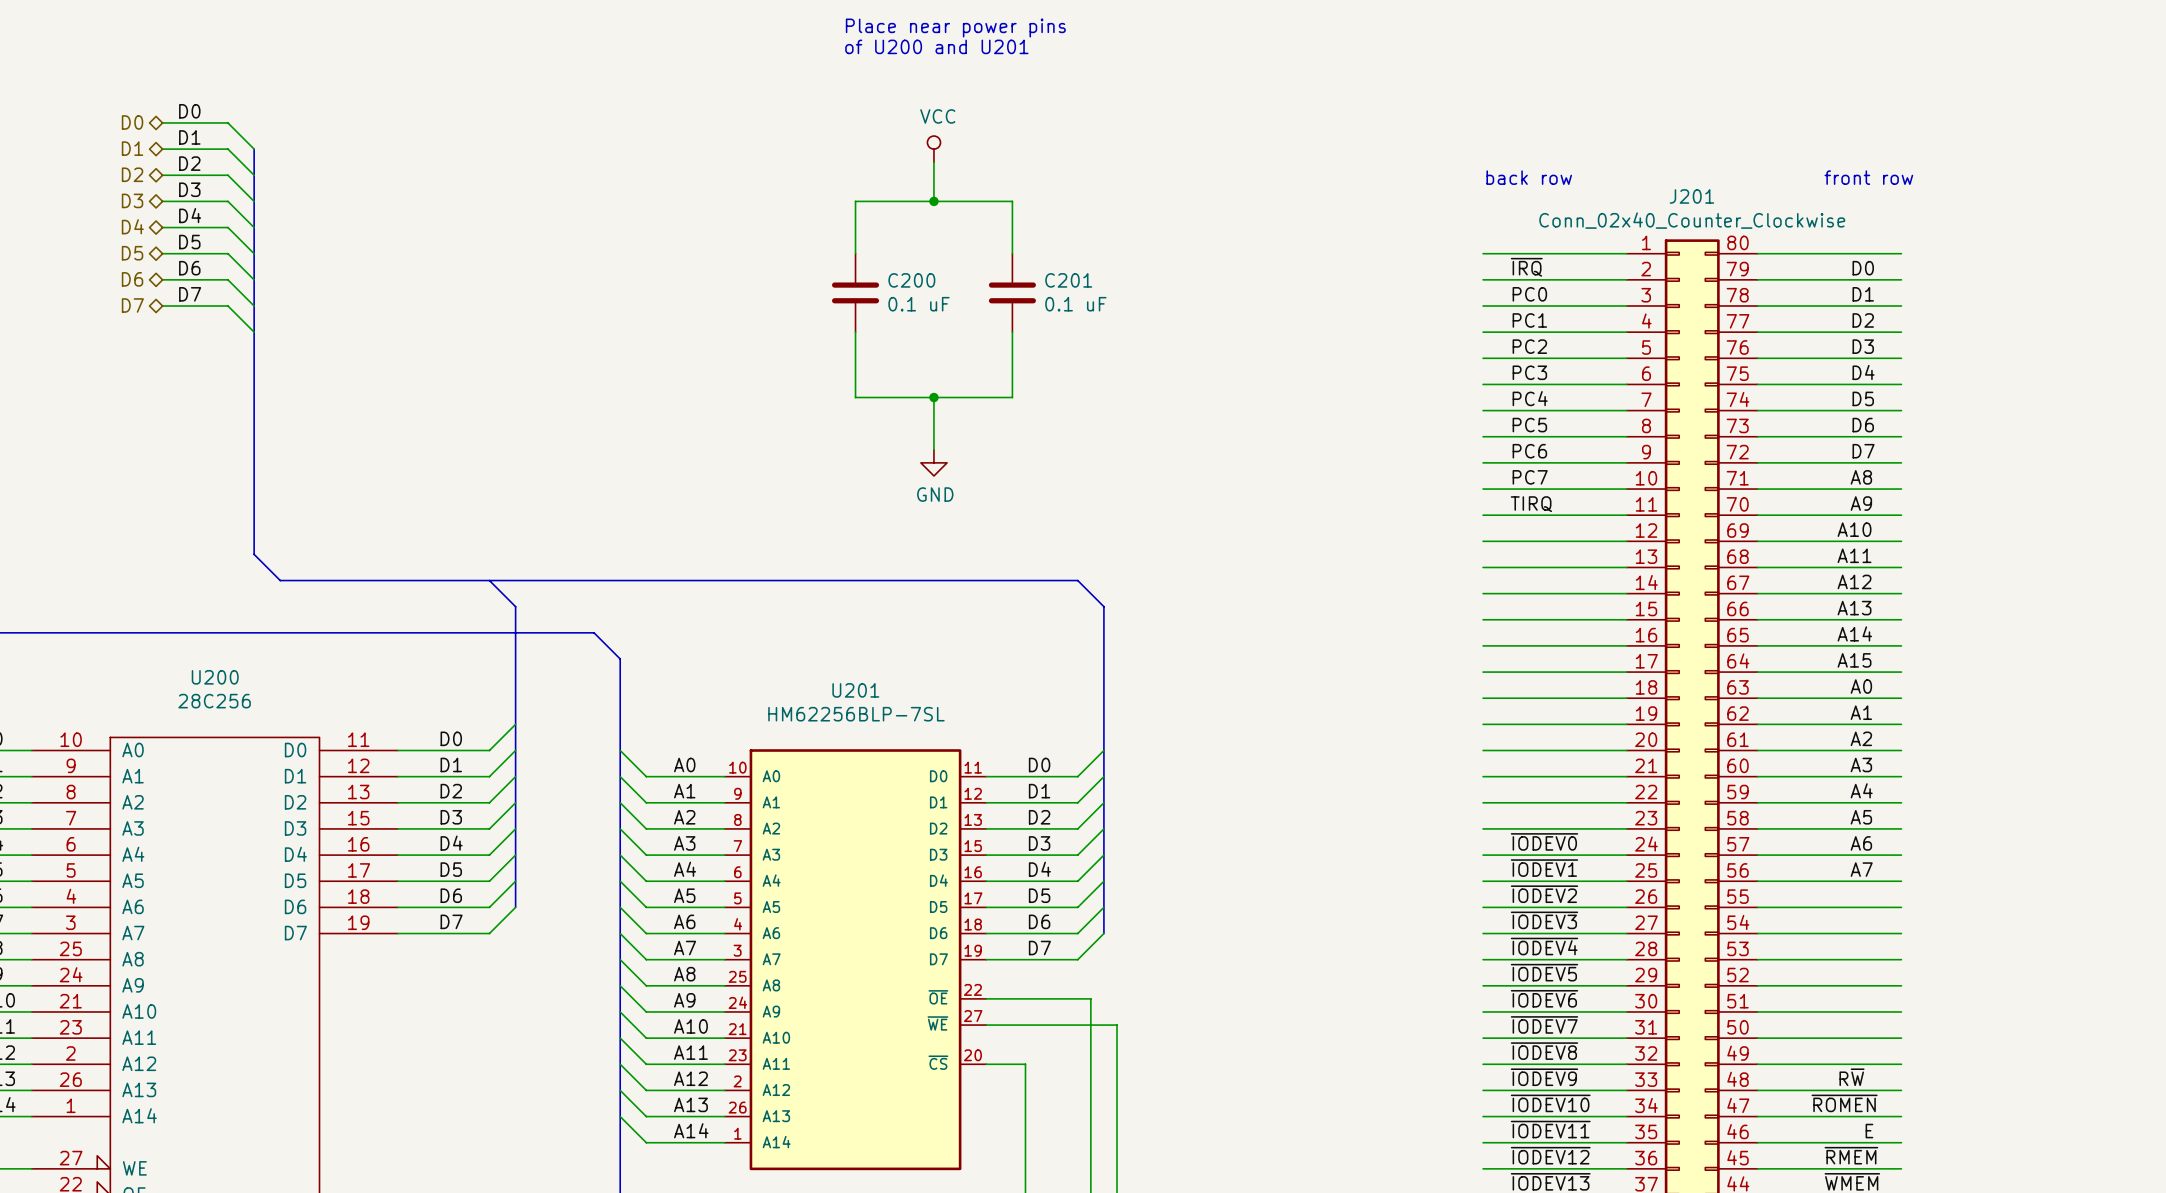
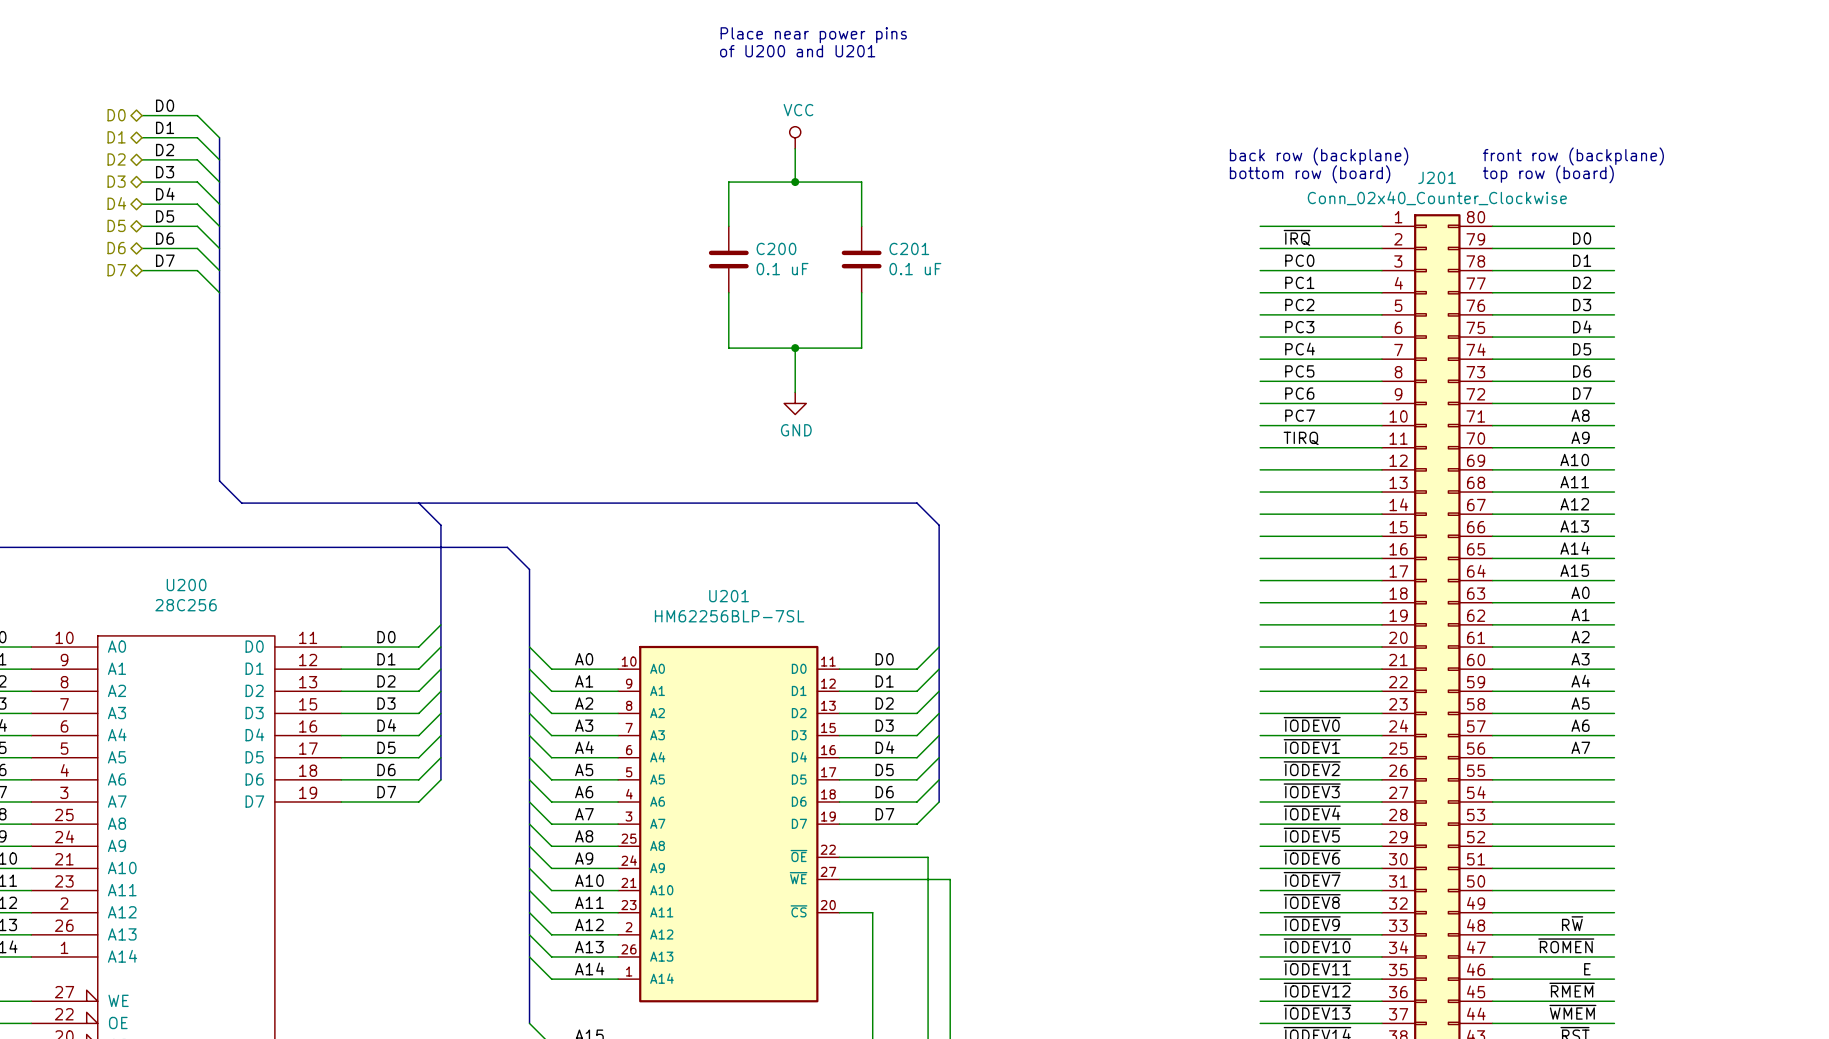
text: none -> back row (backplane) (1319, 156)
text: none -> front row (backplane) (1573, 156)
text: back row (1529, 177) -> none
text: front row (1868, 177) -> none
text: none -> bottom row (board) (1310, 174)
text: none -> top row (board) (1548, 174)

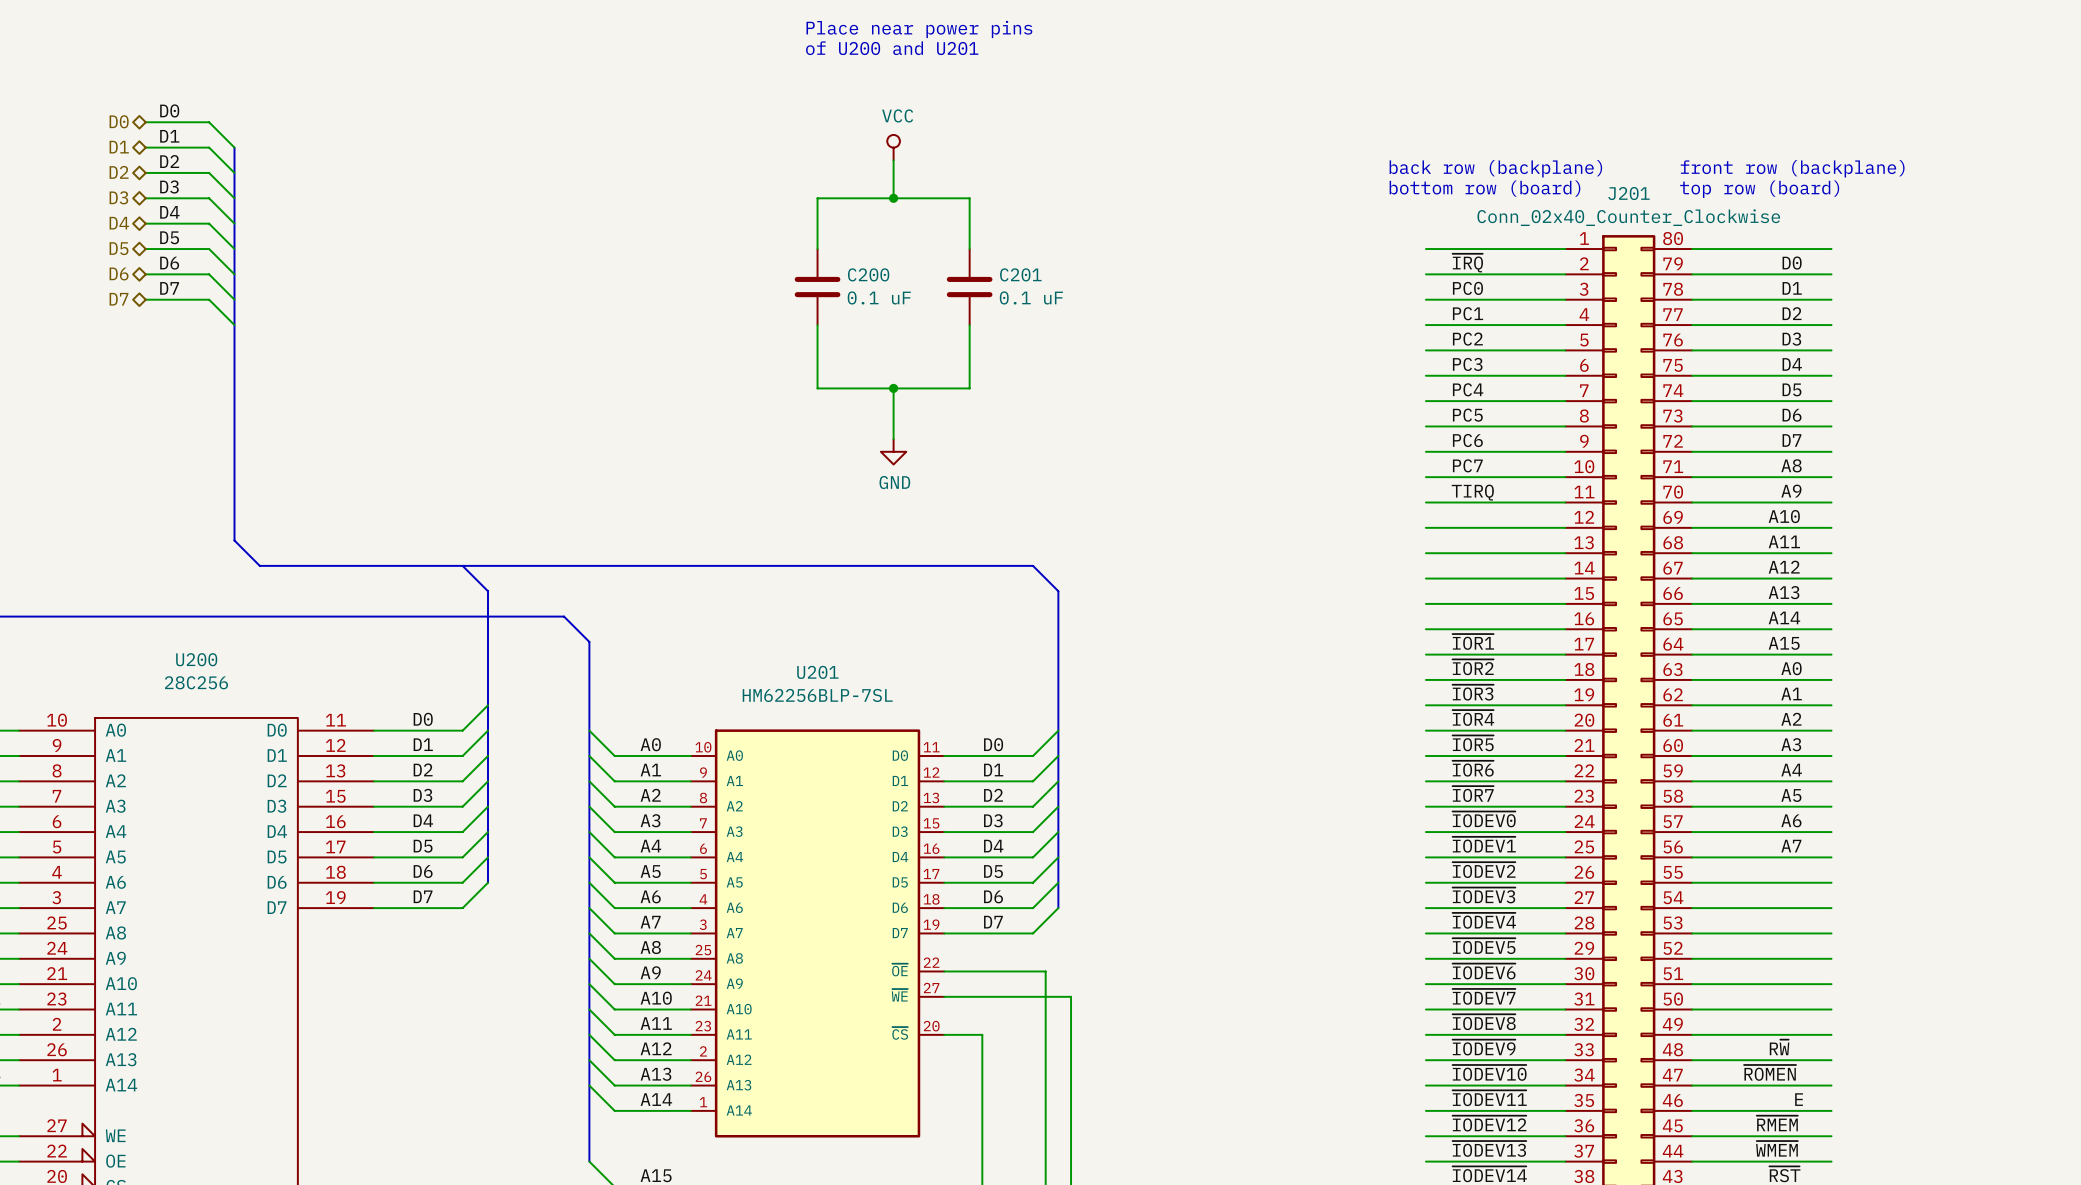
label: none -> ~{IOR1} (1473, 641)
label: none -> ~{IOR2} (1473, 667)
label: none -> ~{IOR3} (1473, 692)
label: none -> ~{IOR4} (1473, 717)
label: none -> ~{IOR5} (1473, 743)
label: none -> ~{IOR6} (1473, 768)
label: none -> ~{IOR7} (1473, 794)

